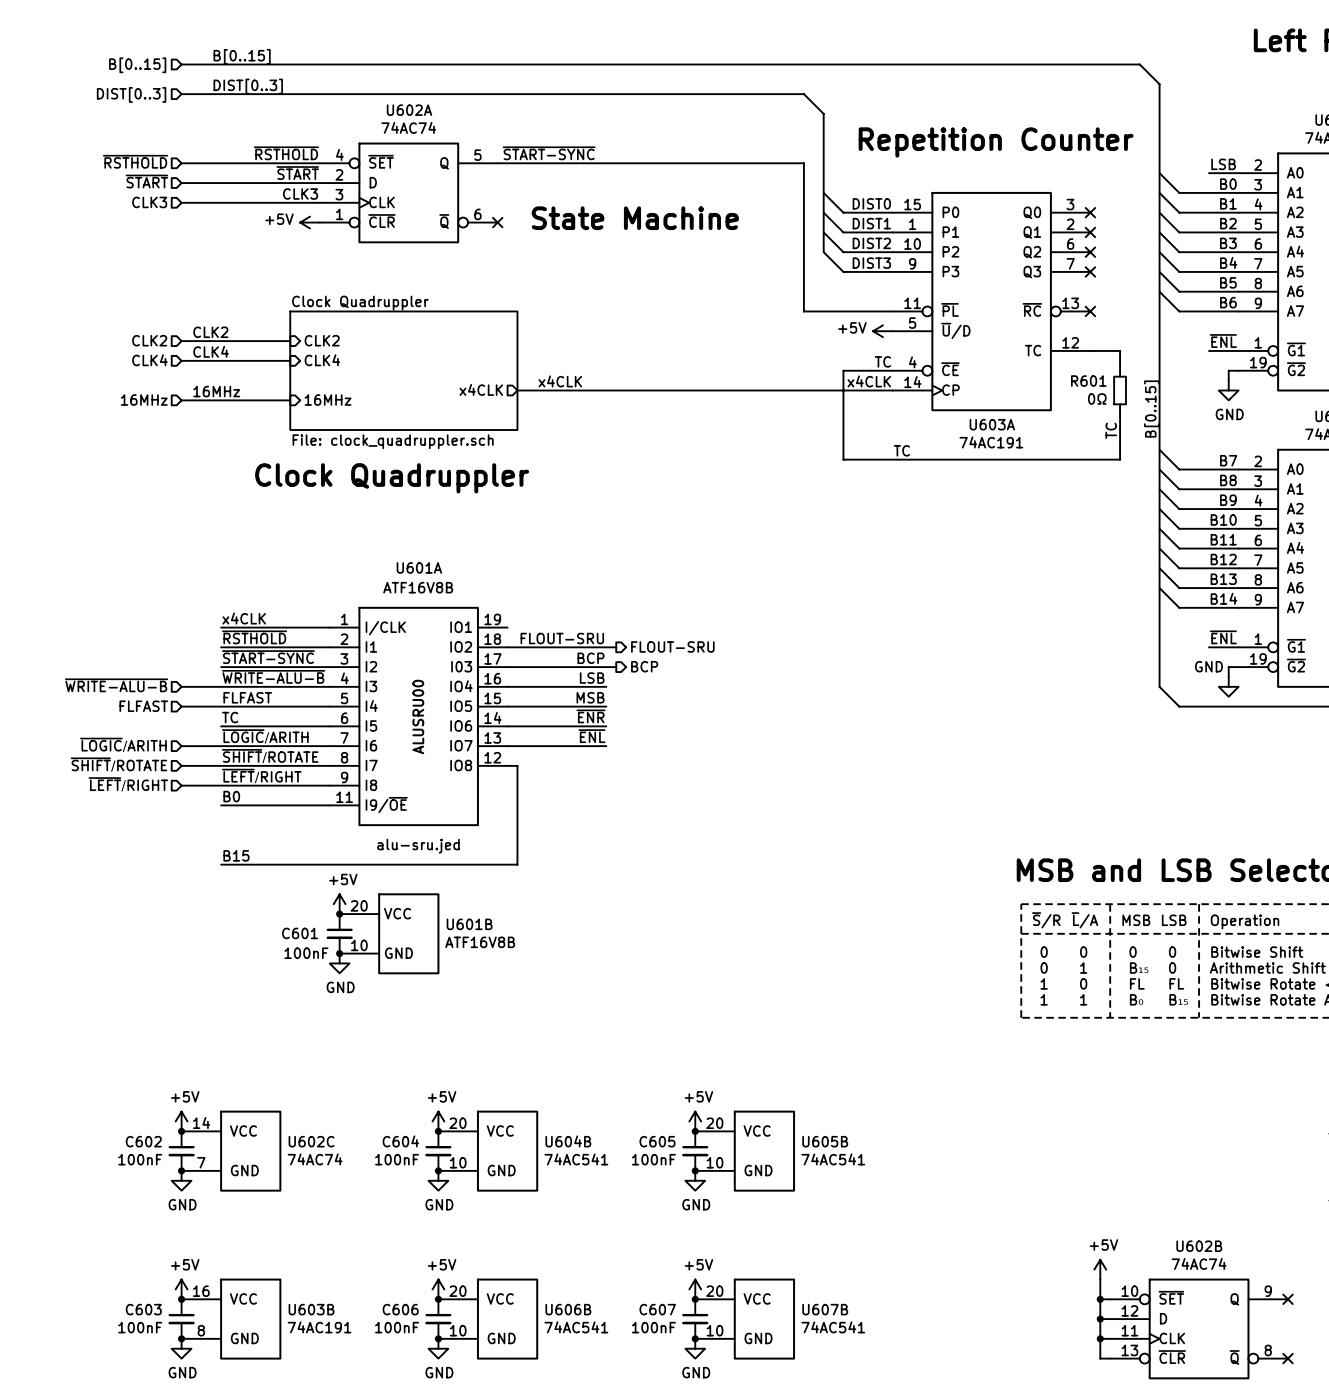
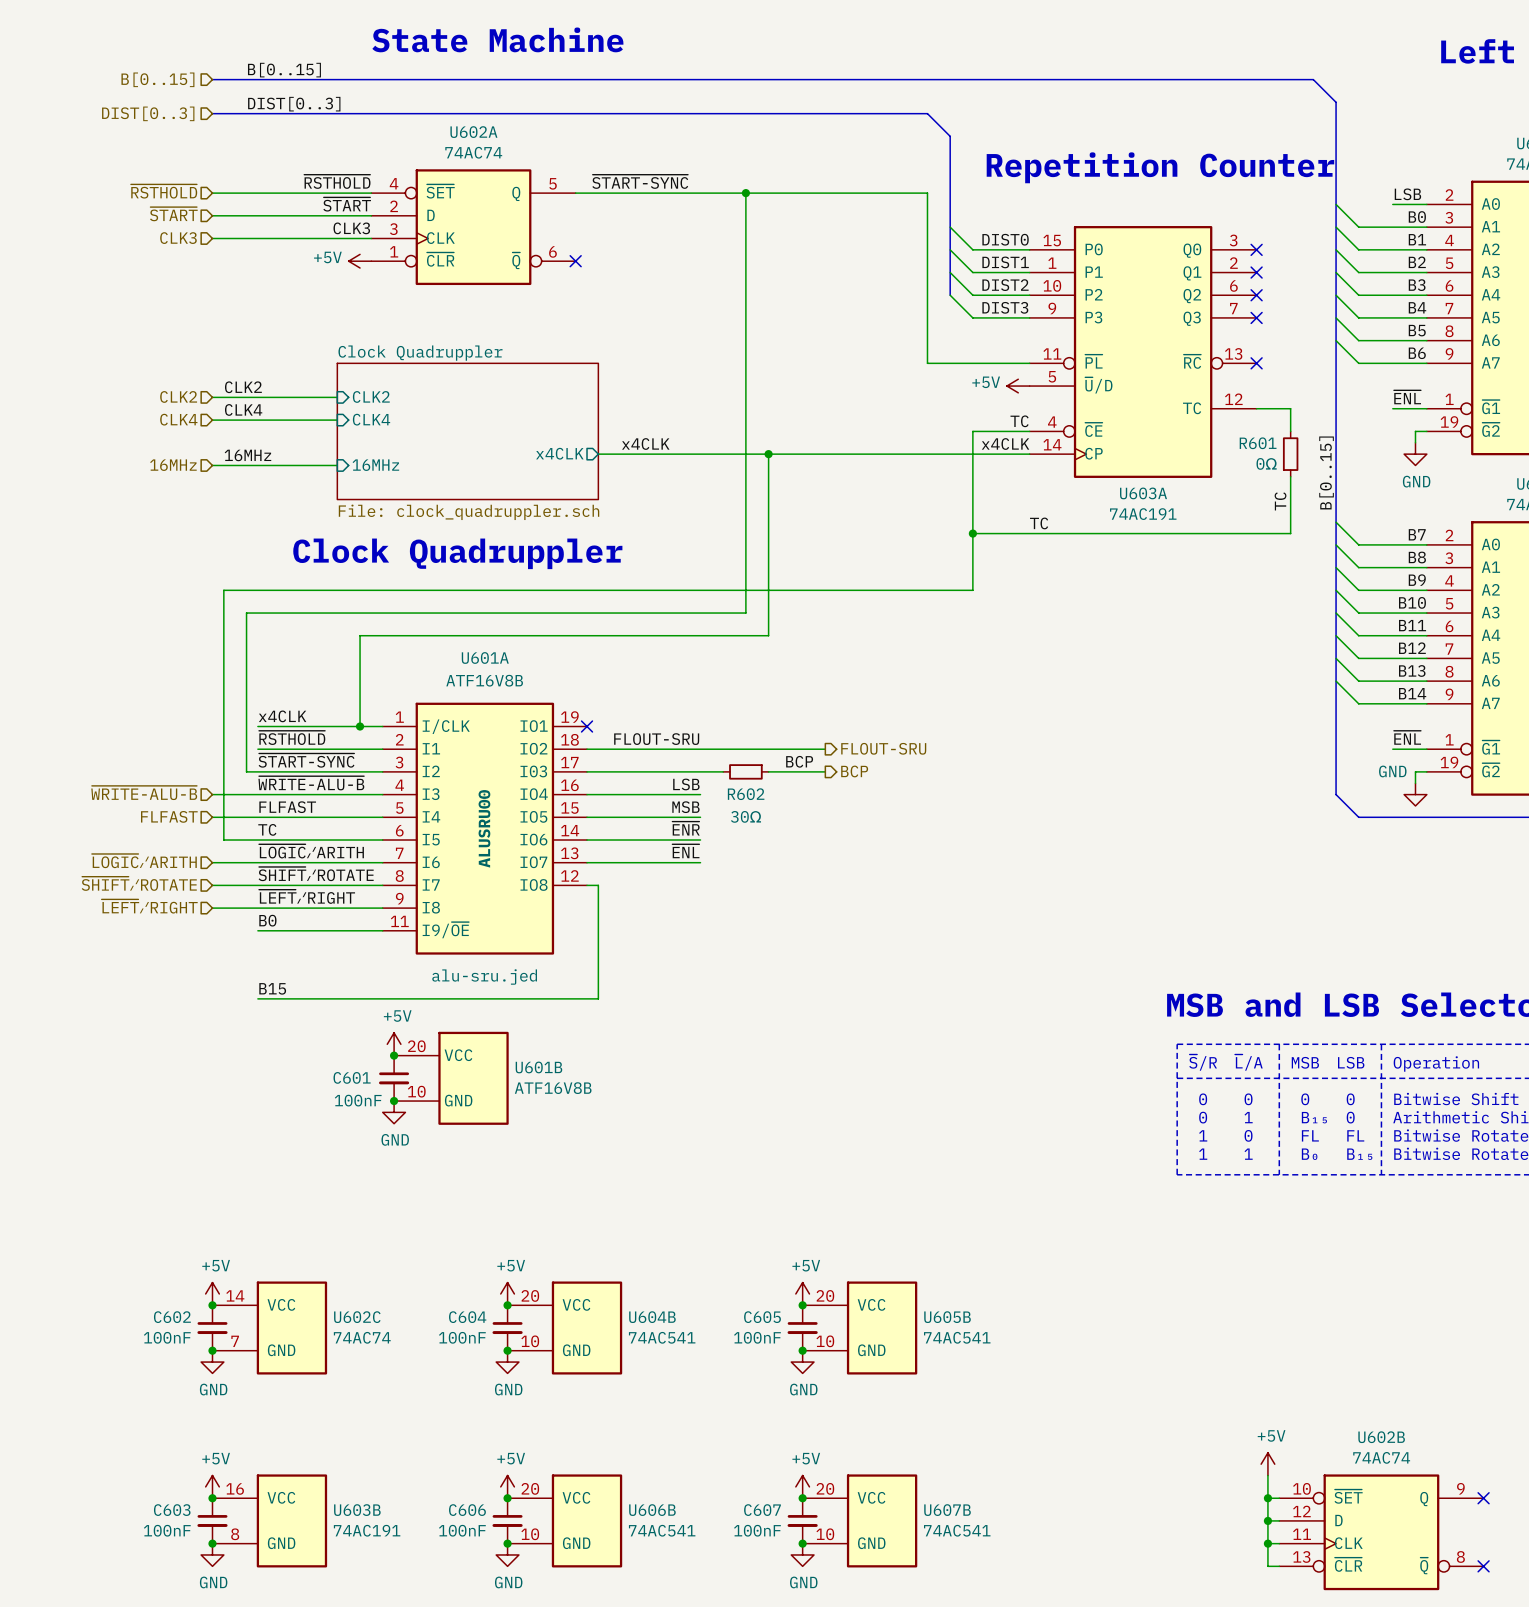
text: none -> State Machine (497, 39)
wire: none -> (745, 193) (745, 613) (246, 613) (246, 771) (257, 771)
junction: none -> (745, 193)
text: State Machine (635, 218) -> none
wire: none -> (768, 454) (768, 635) (360, 635) (360, 726)
junction: none -> (768, 454)
wire: none -> (972, 533) (972, 590) (223, 590) (223, 840) (257, 840)
junction: none -> (972, 533)
junction: none -> (360, 726)
no-connect mark: none -> (587, 726)
hierarchical label position: FLOUT-SRU (672, 646) -> FLOUT-SRU (883, 748)
wire: none -> (711, 749) (825, 749)
label position: BCP (591, 658) -> BCP (799, 761)
hierarchical label position: BCP (644, 666) -> BCP (854, 771)
wire: none -> (711, 771) (723, 771)
R602: none -> 30Ω (745, 771)
wire: none -> (768, 771) (825, 771)

